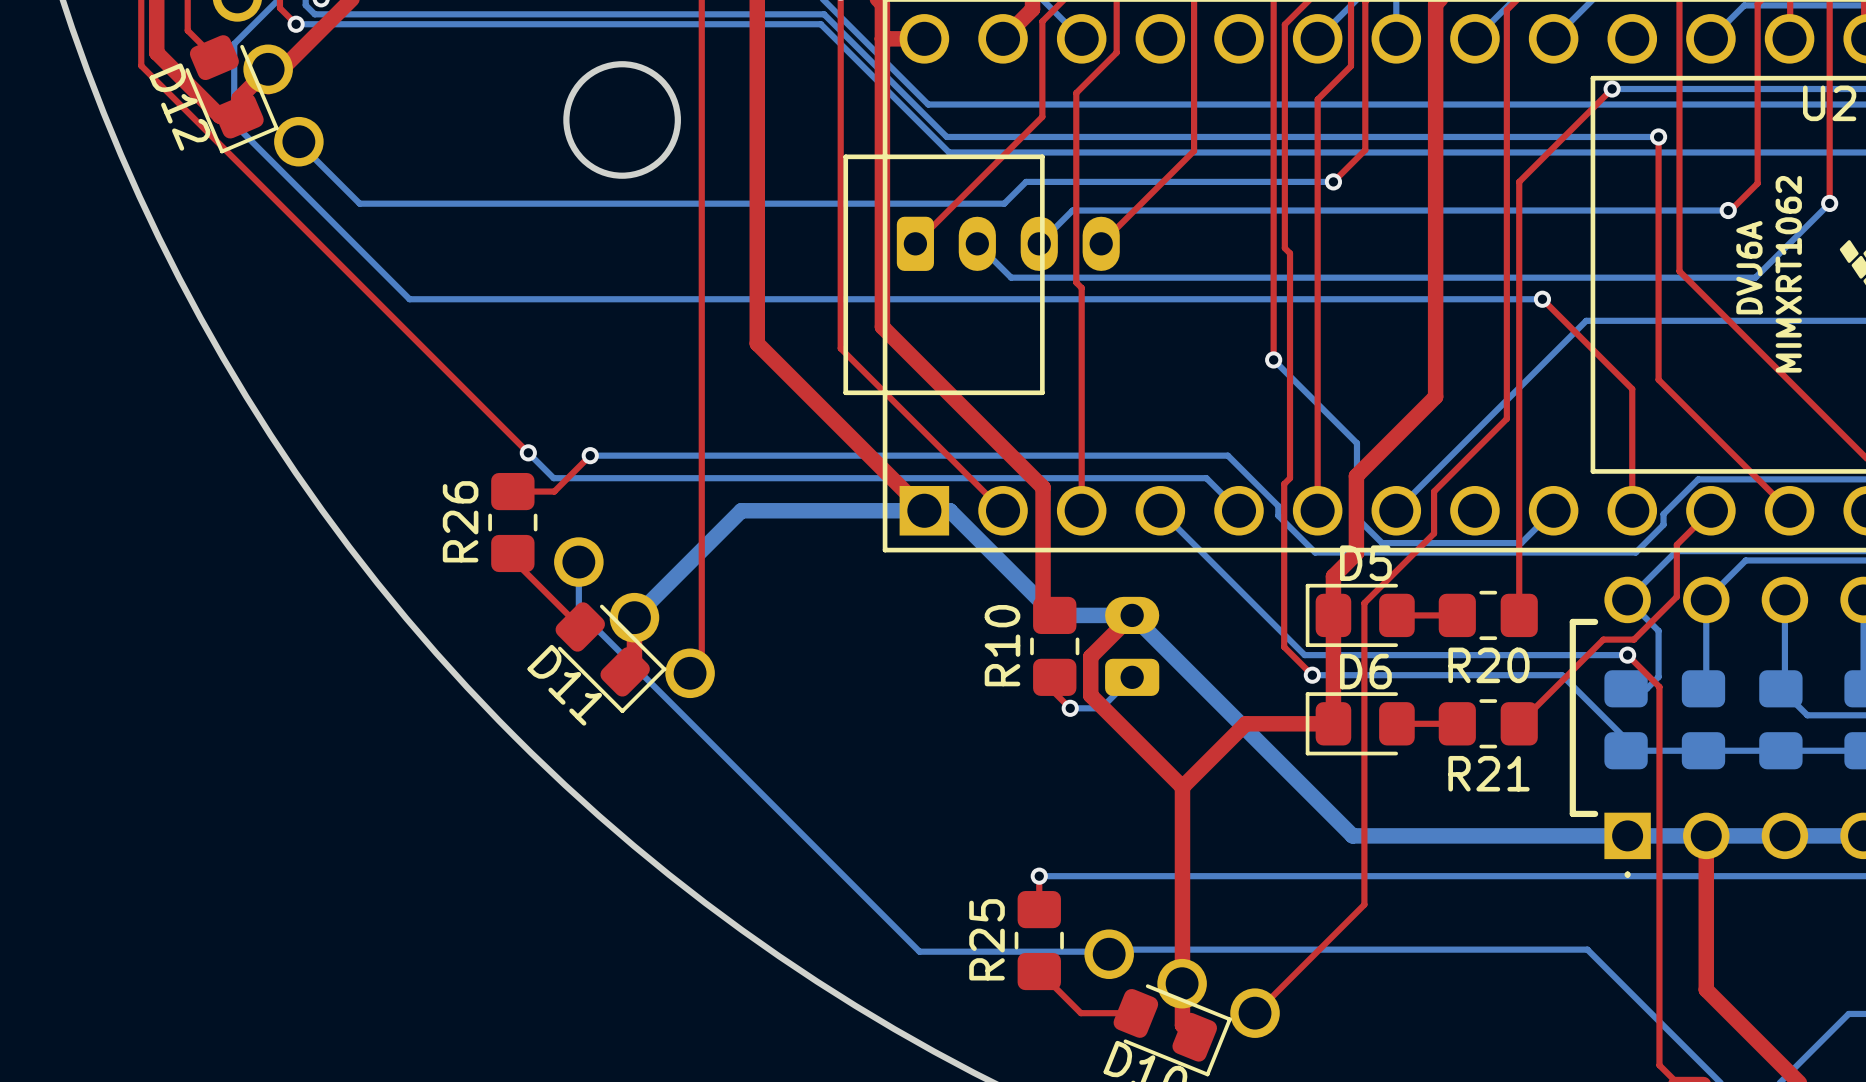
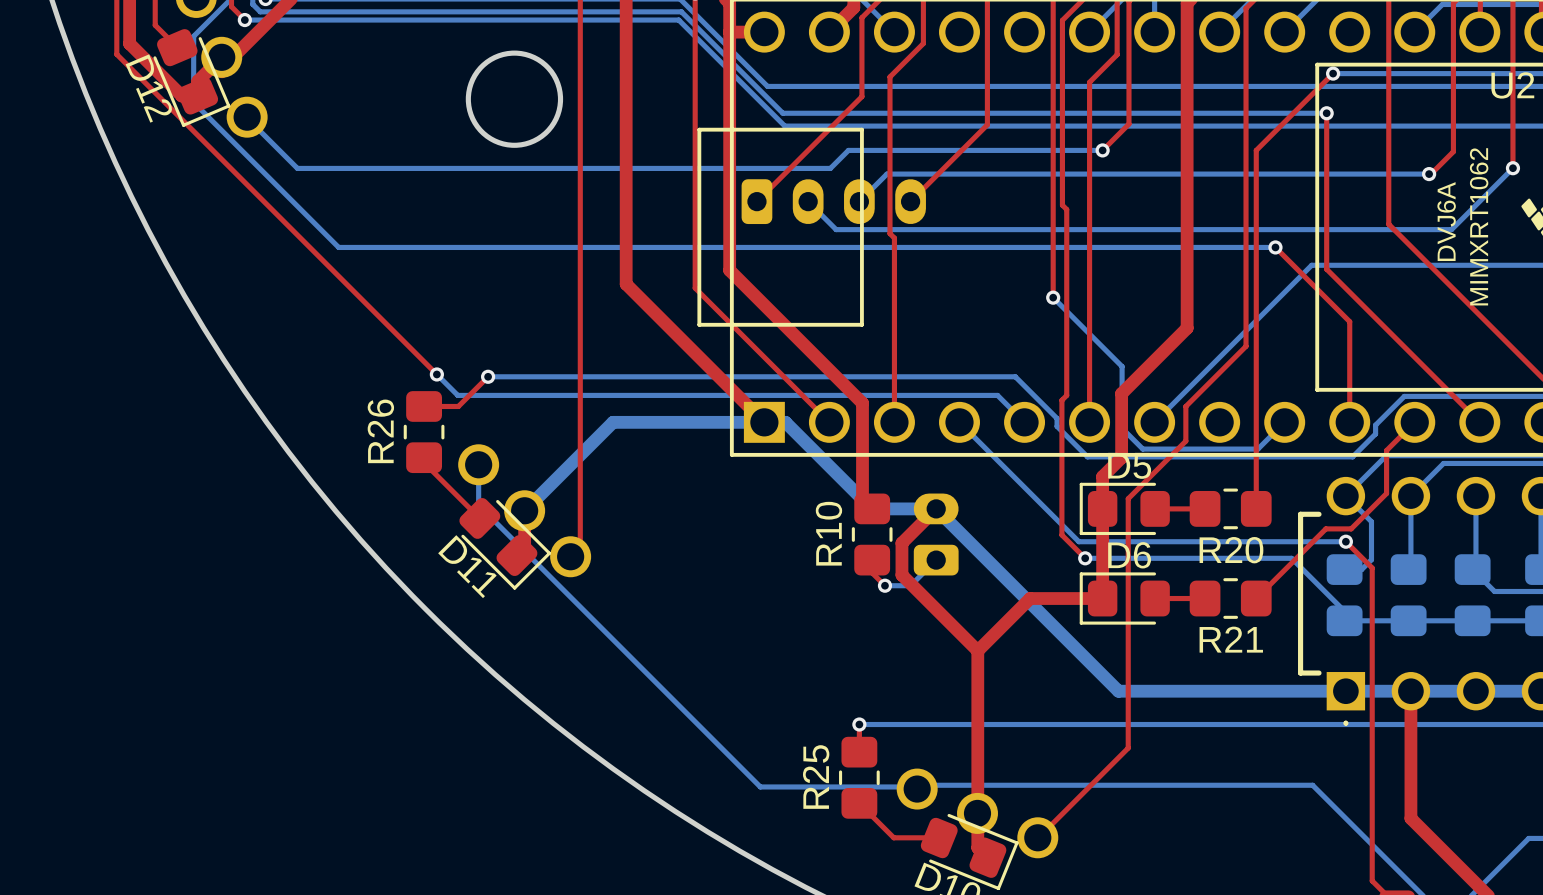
bottom track: (1604, 136) (1658, 136) -> none
top track: (1658, 136) (1658, 379) -> (1326, 113) (1326, 269) (1371, 314)
via position: (1658, 136) -> (1326, 113)

